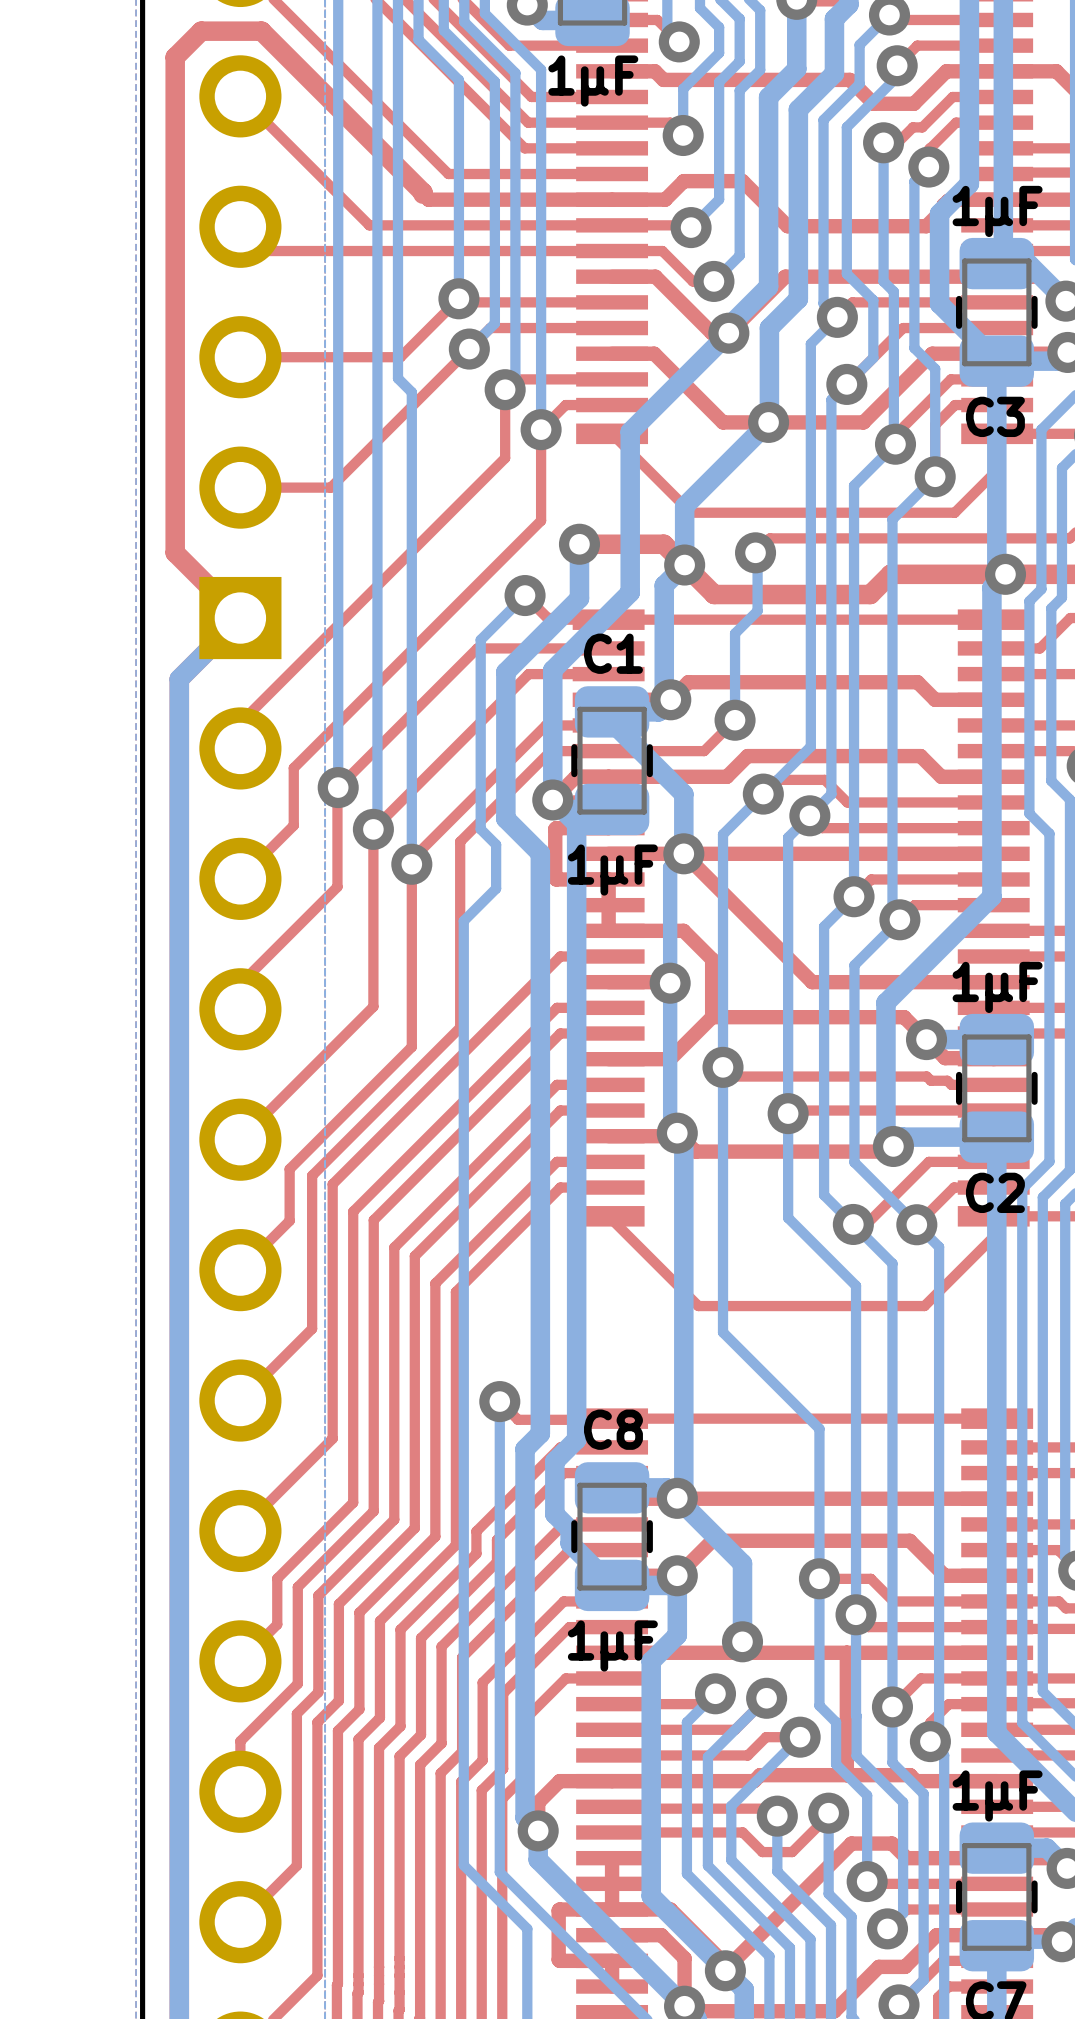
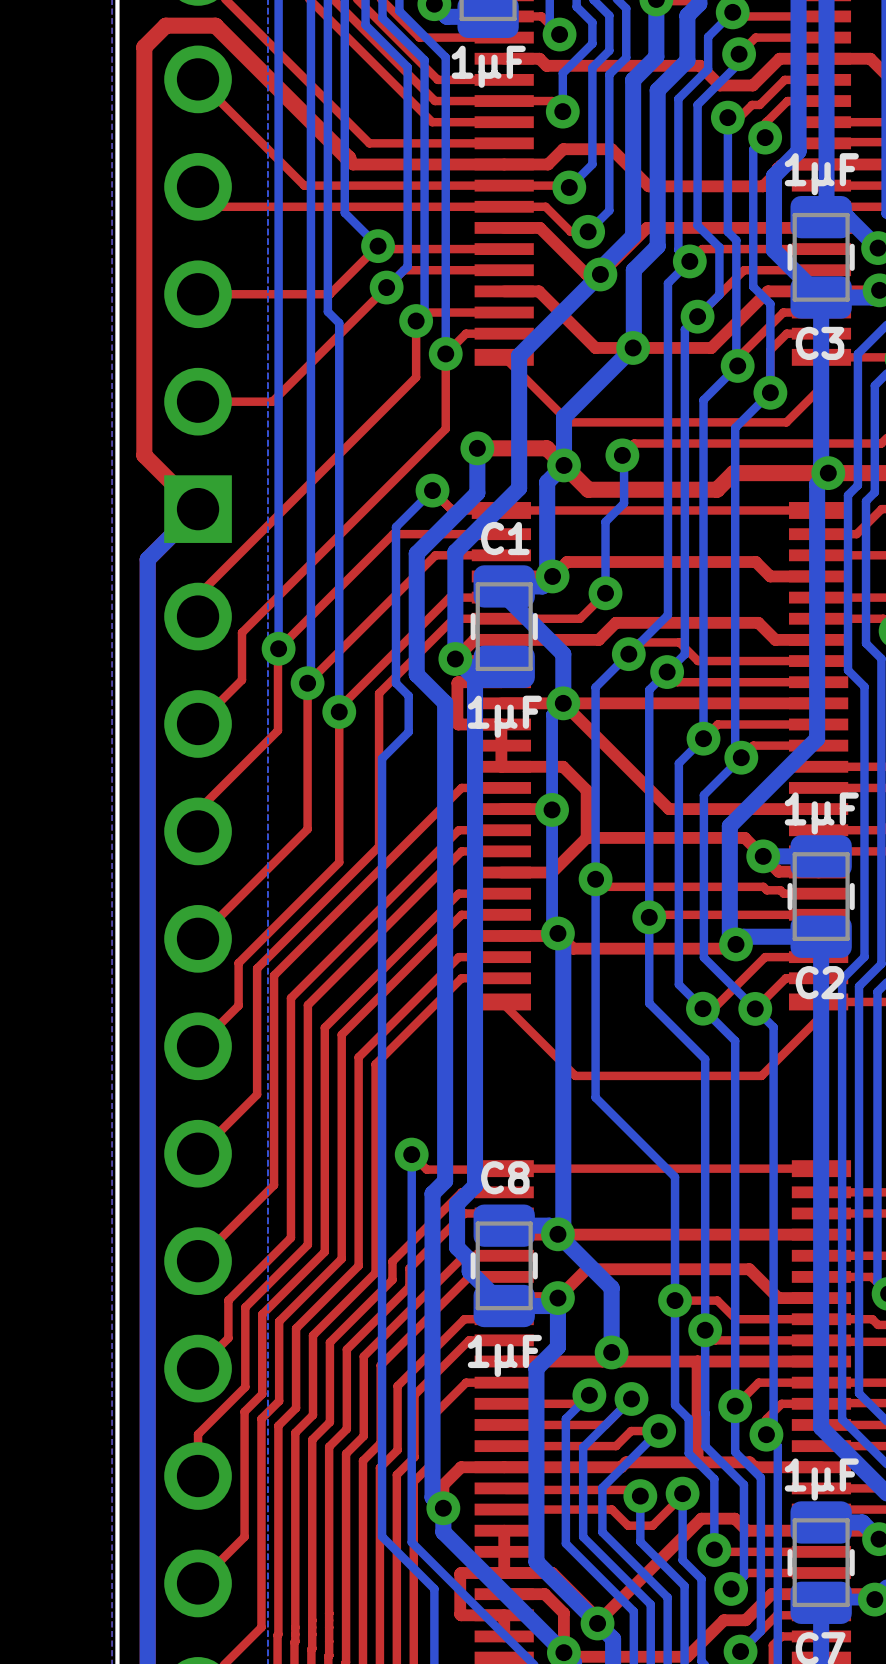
bottom track: (418, 39) (458, 80) (458, 298) -> (344, 32) (344, 212) (378, 246)

